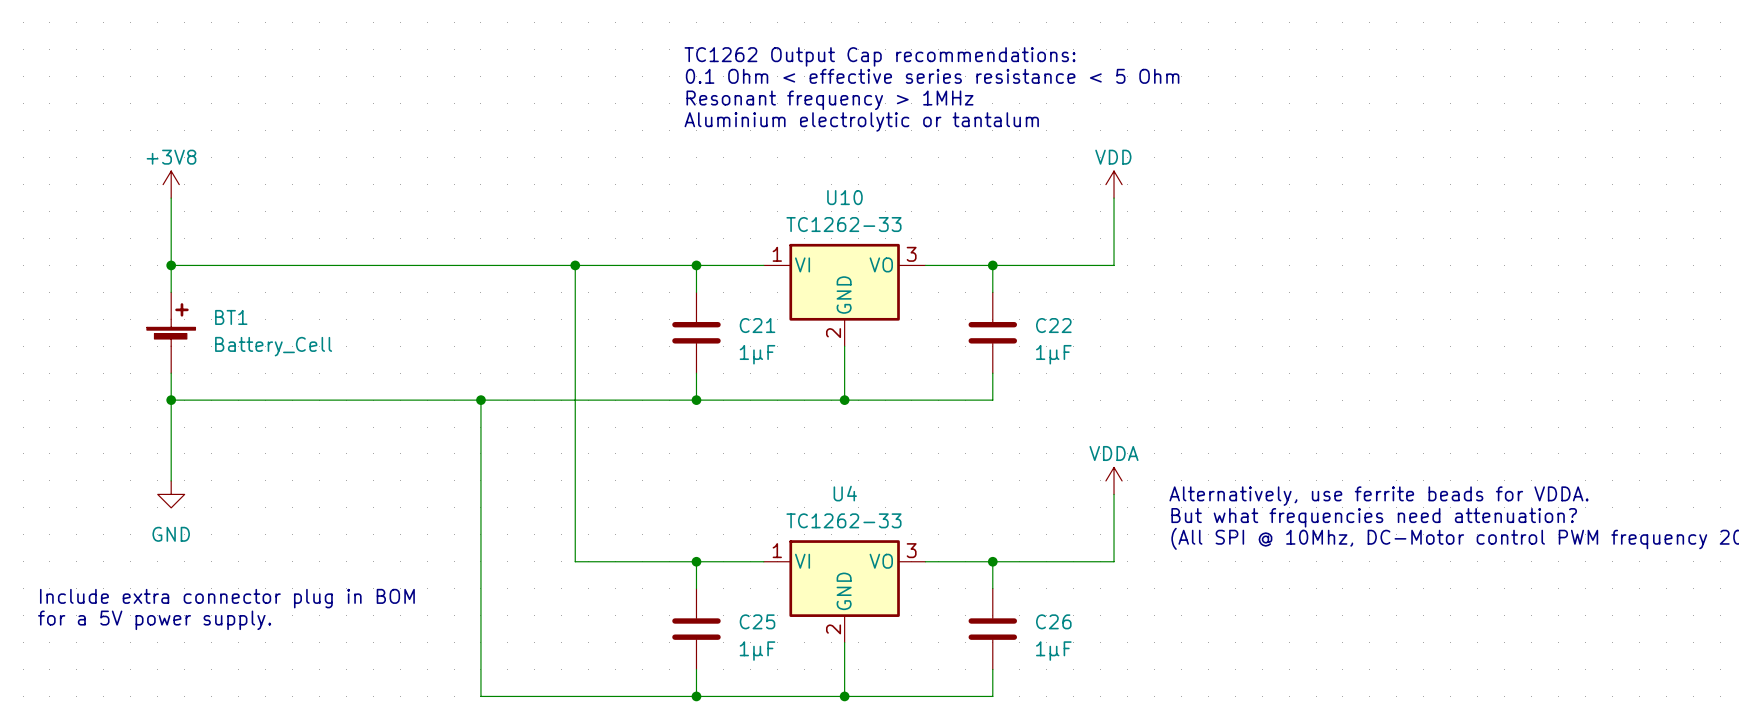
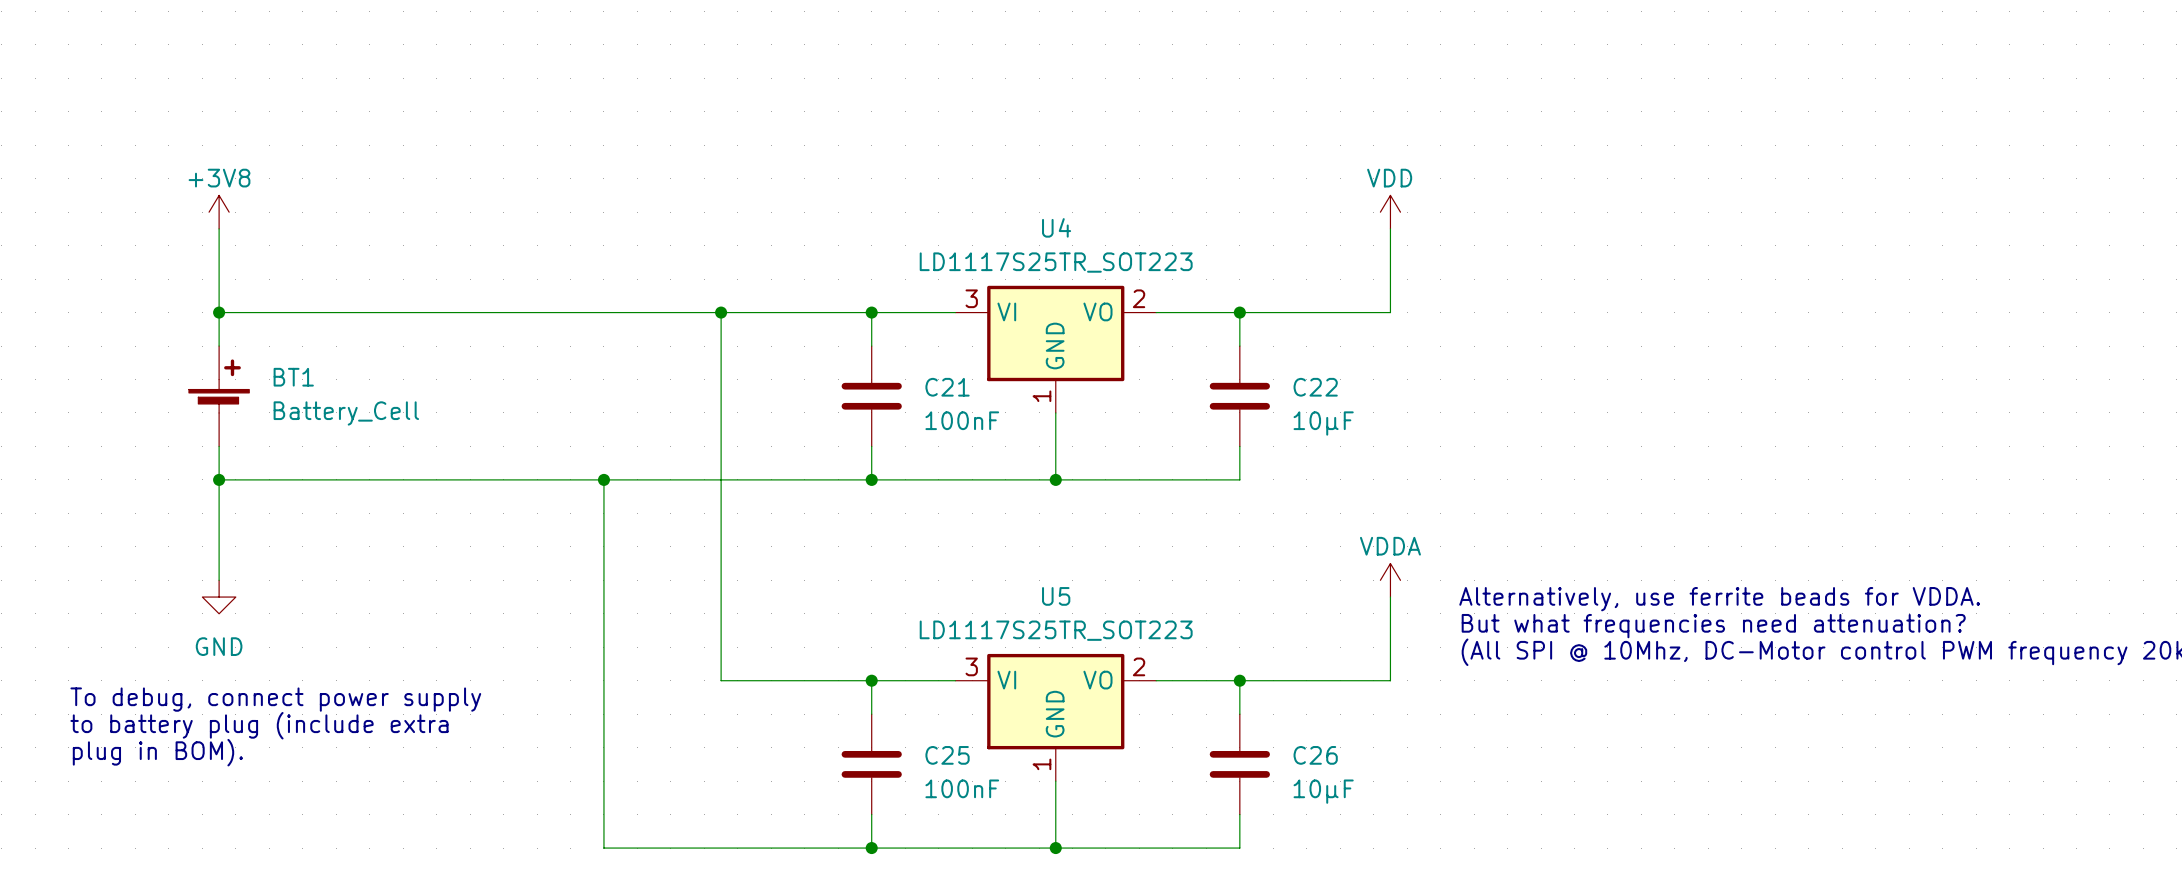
text: TC1262 Output Cap recommendations: (880, 56) -> none
text: 0.1 Ohm < effective series resistance < 5 Ohm (932, 76) -> none
text: Resonant frequency > 1MHz (829, 100) -> none
text: Aluminium electrolytic or tantalum (861, 121) -> none
U10: TC1262-33 (844, 295) -> none
C21 value: 1µF (757, 354) -> 100nF (962, 420)
C22 value: 1µF (1053, 354) -> 10µF (1323, 423)
U4 value: TC1262-33 (843, 520) -> LD1117S25TR_SOT223 (1056, 262)
U4 pin number: 1 (777, 550) -> 3 (971, 298)
U4 pin number: 3 (911, 550) -> 2 (1139, 298)
text: none -> To debug, connect power supply (275, 699)
U4 position: (844, 591) -> (1055, 349)
U5: none -> LD1117S25TR_SOT223 (1055, 717)
text: none -> to battery plug (include extra (259, 725)
text: Include extra connector plug in BOM (227, 598) -> none
text: none -> plug in BOM). (157, 752)
text: for a 5V power supply. (154, 620) -> none
U4 pin number: 2 (833, 629) -> 1 (1041, 396)
C25 value: 1µF (757, 651) -> 100nF (962, 788)
C26 value: 1µF (1053, 651) -> 10µF (1323, 791)

